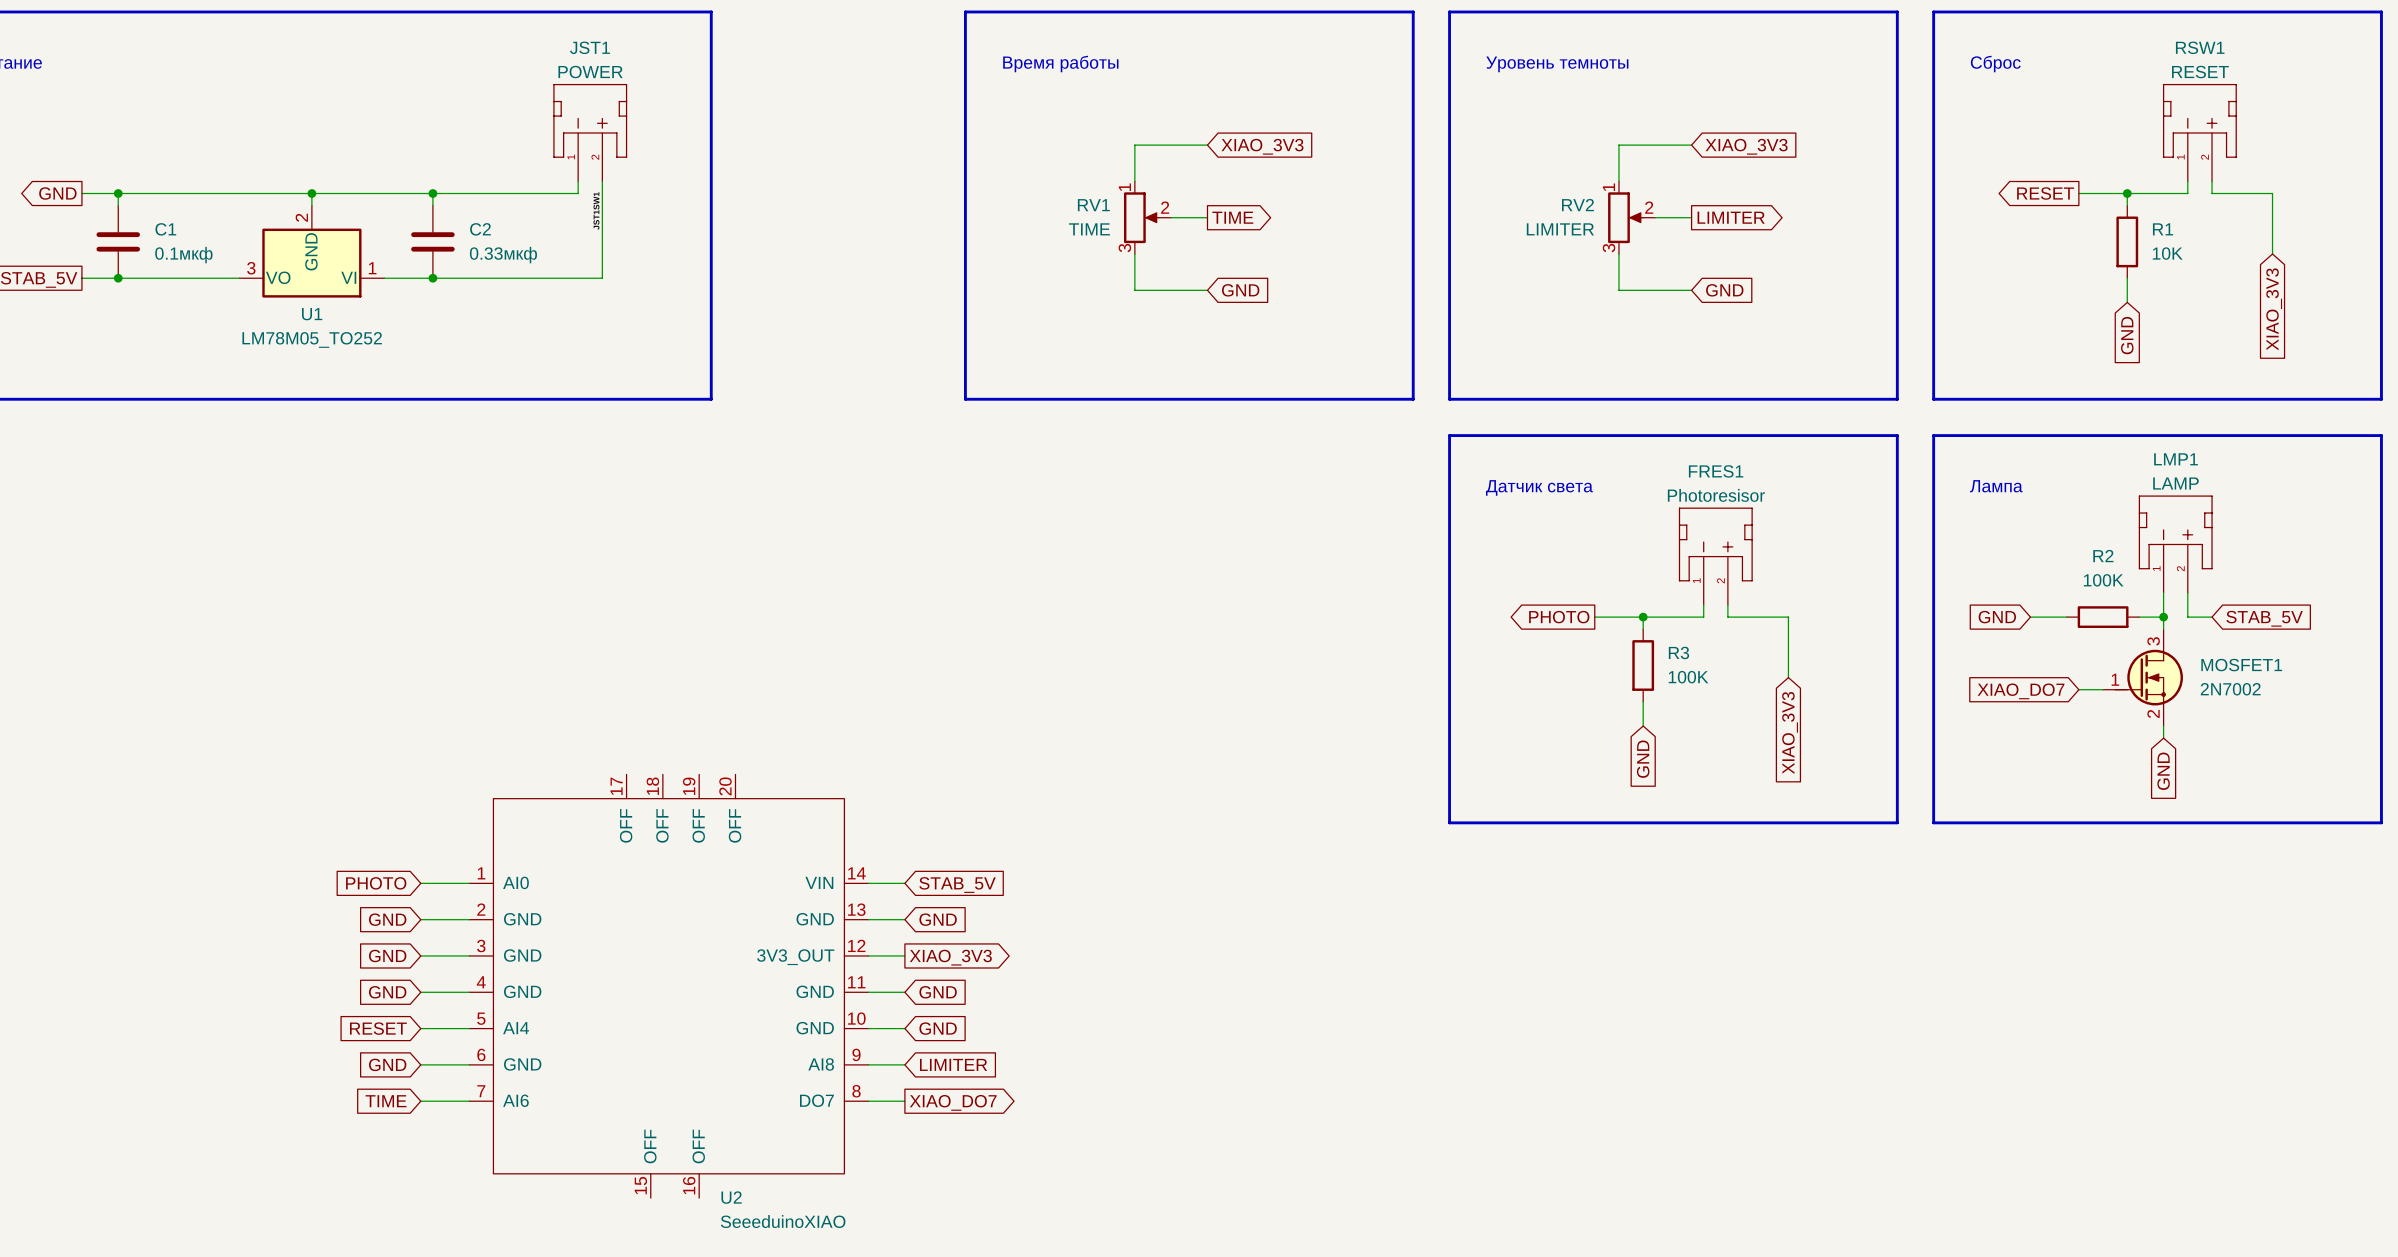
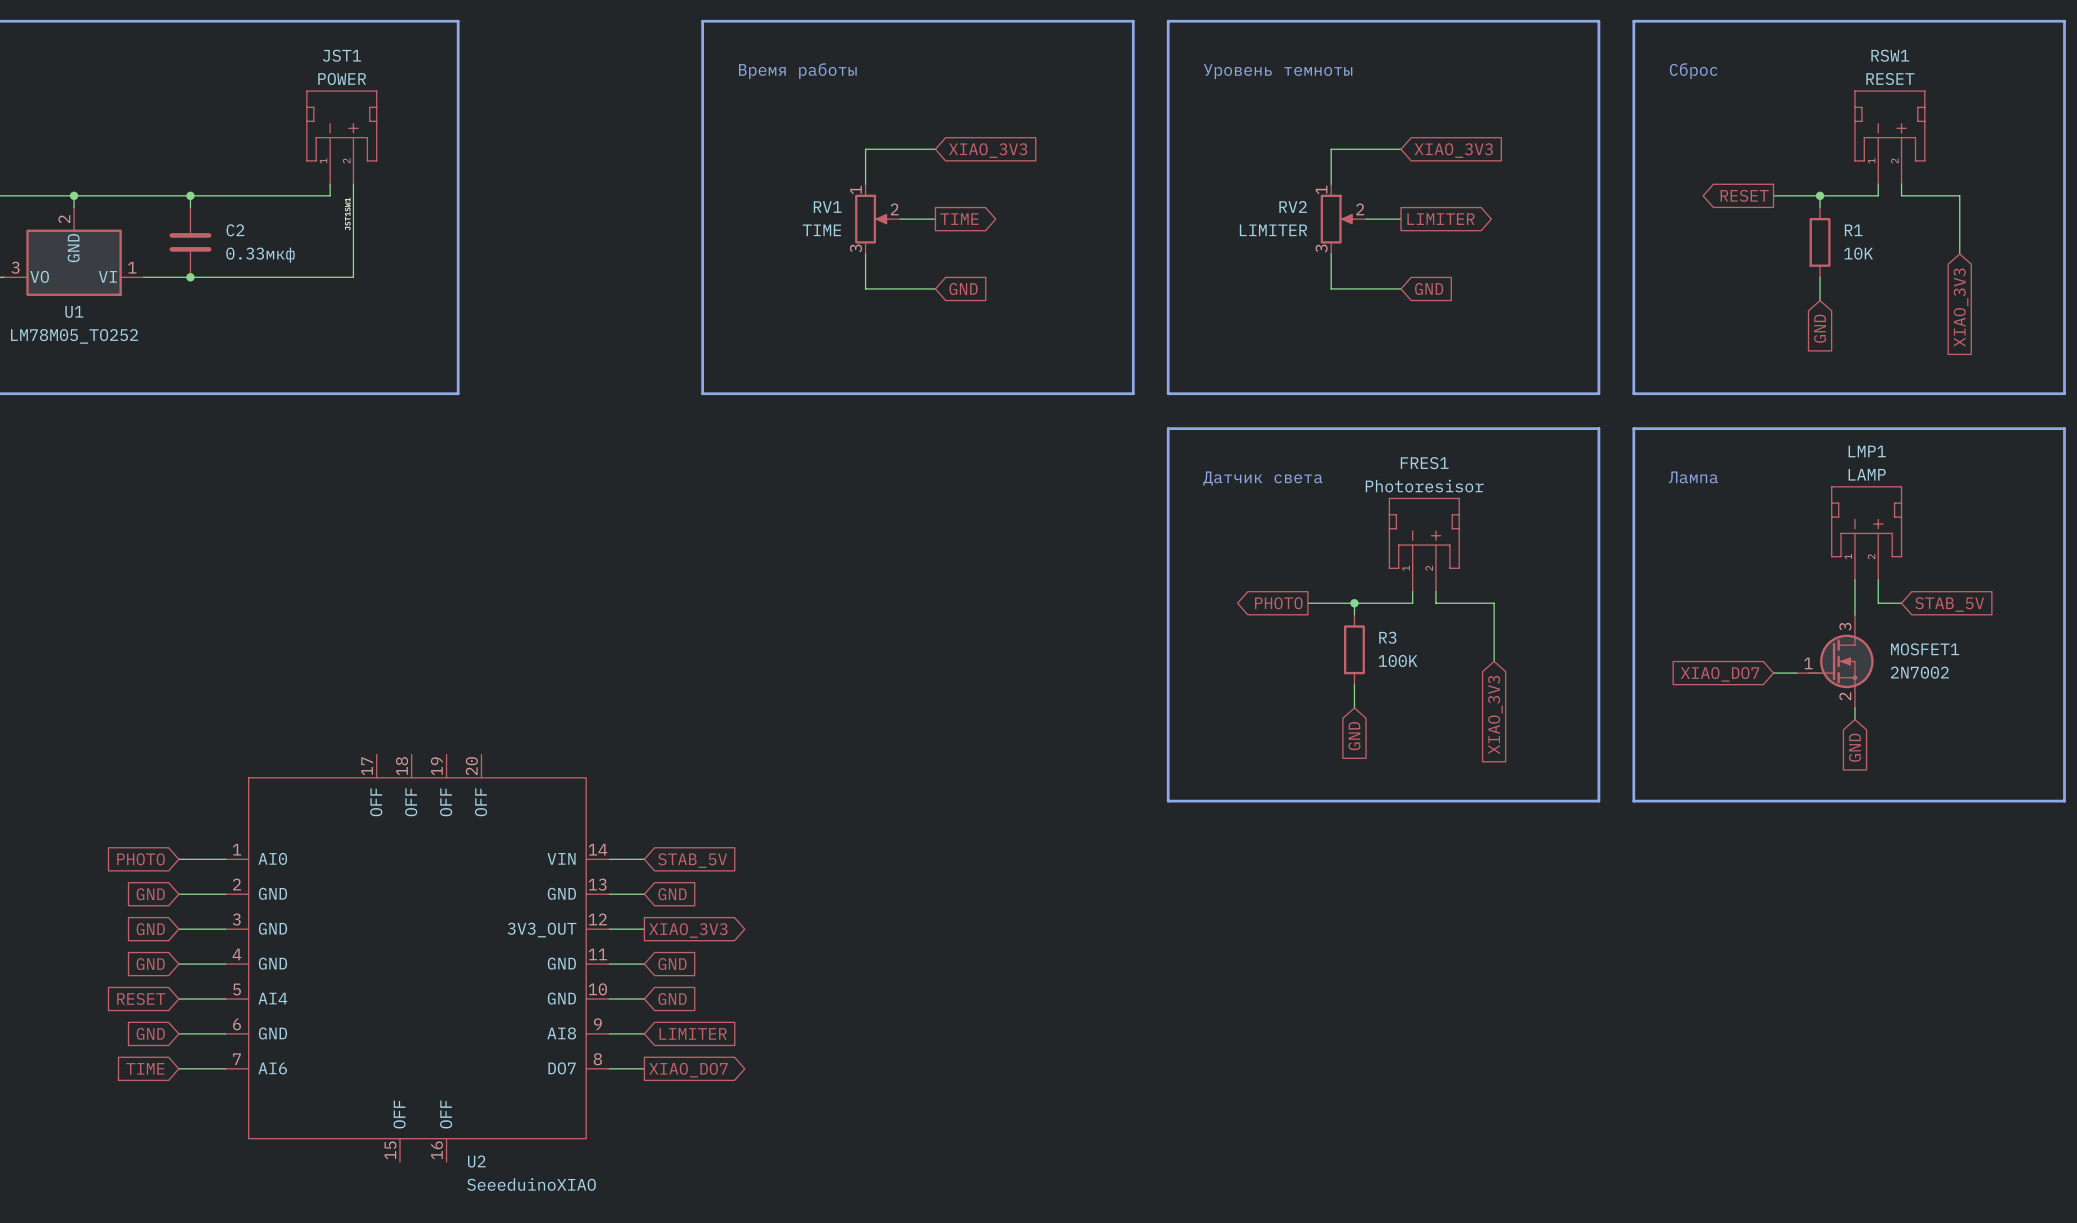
global label: GND (1997, 617) -> none
wire: (2030, 617) (2066, 617) -> none
R2: 100K (2103, 617) -> none
wire: (2139, 617) (2163, 617) -> none
junction: (2163, 617) -> none

